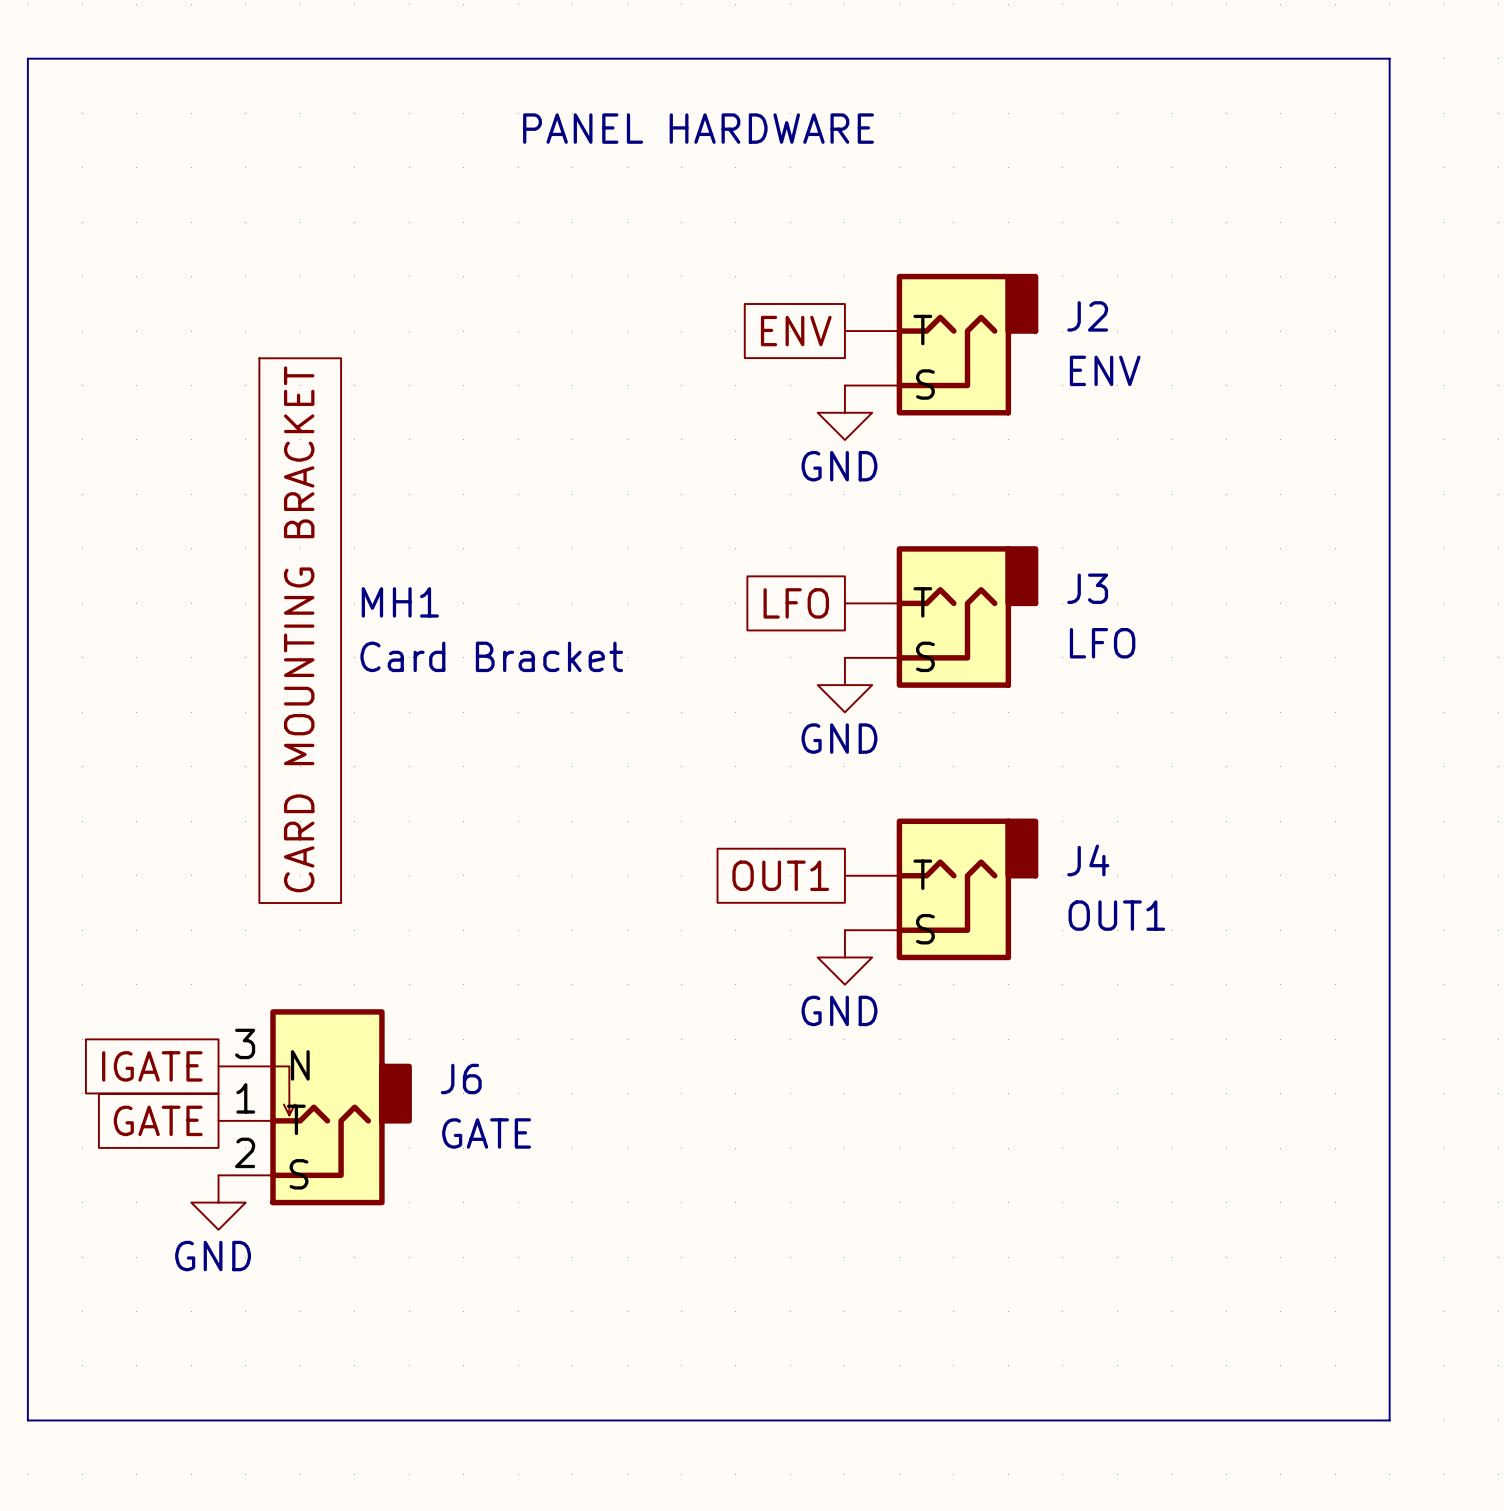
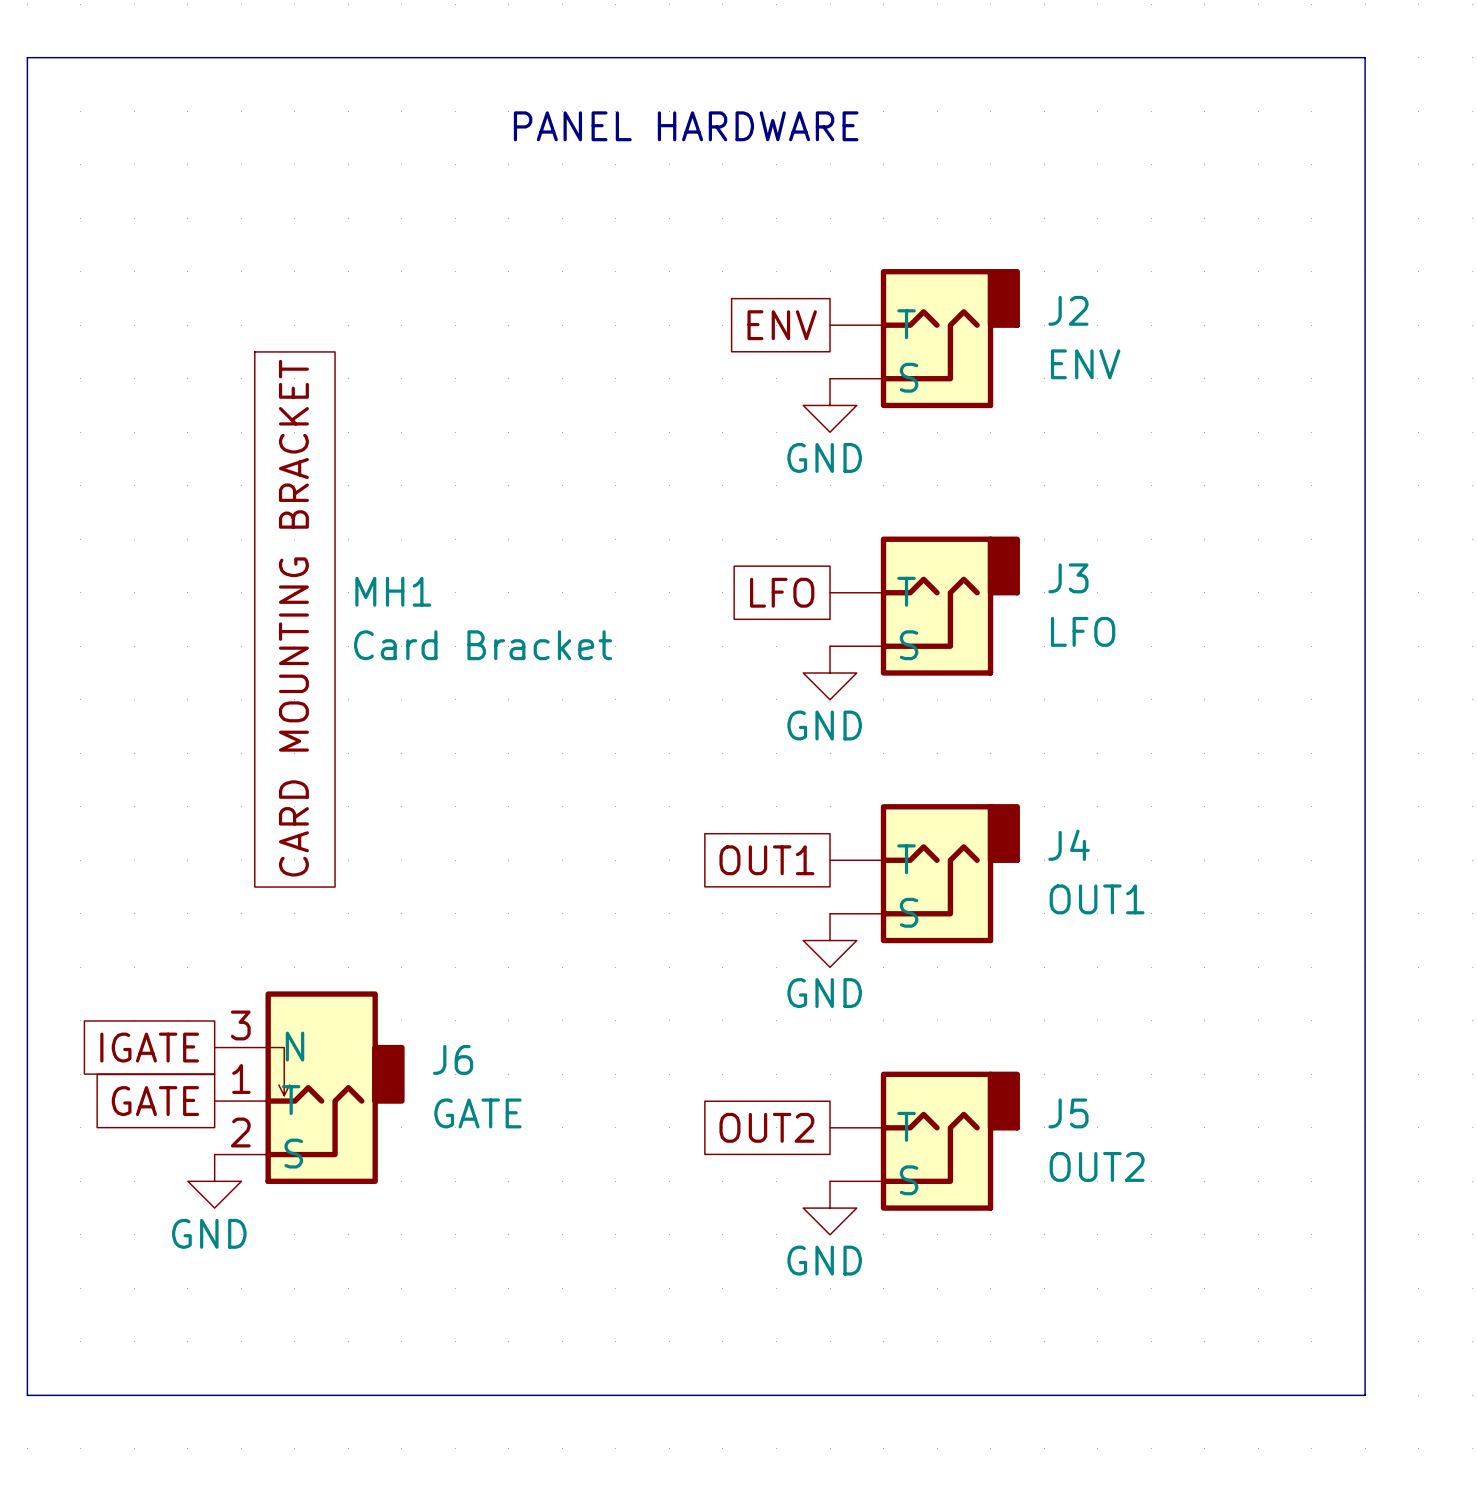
global label: none -> OUT2 (766, 1127)
J5: none -> (924, 1141)
power symbol: none -> GND (830, 1208)

